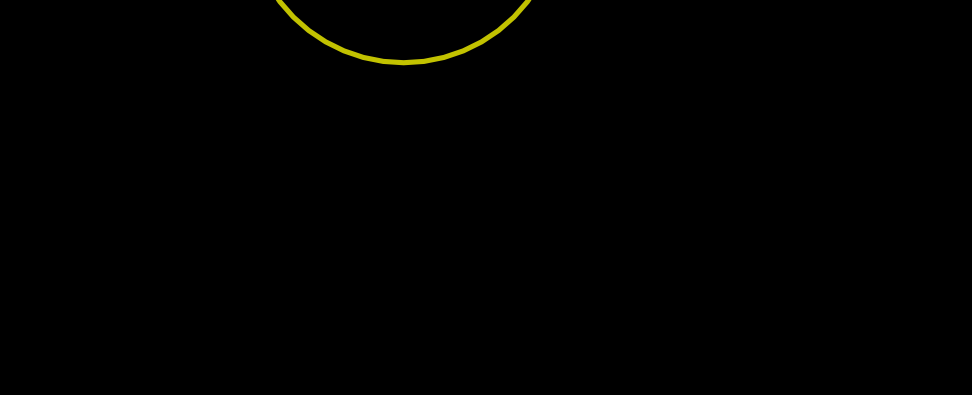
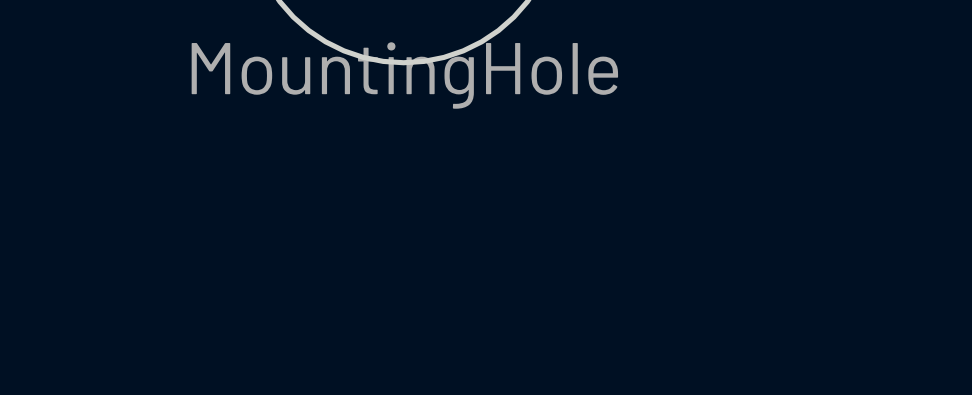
part value: none -> MountingHole (404, 75)

